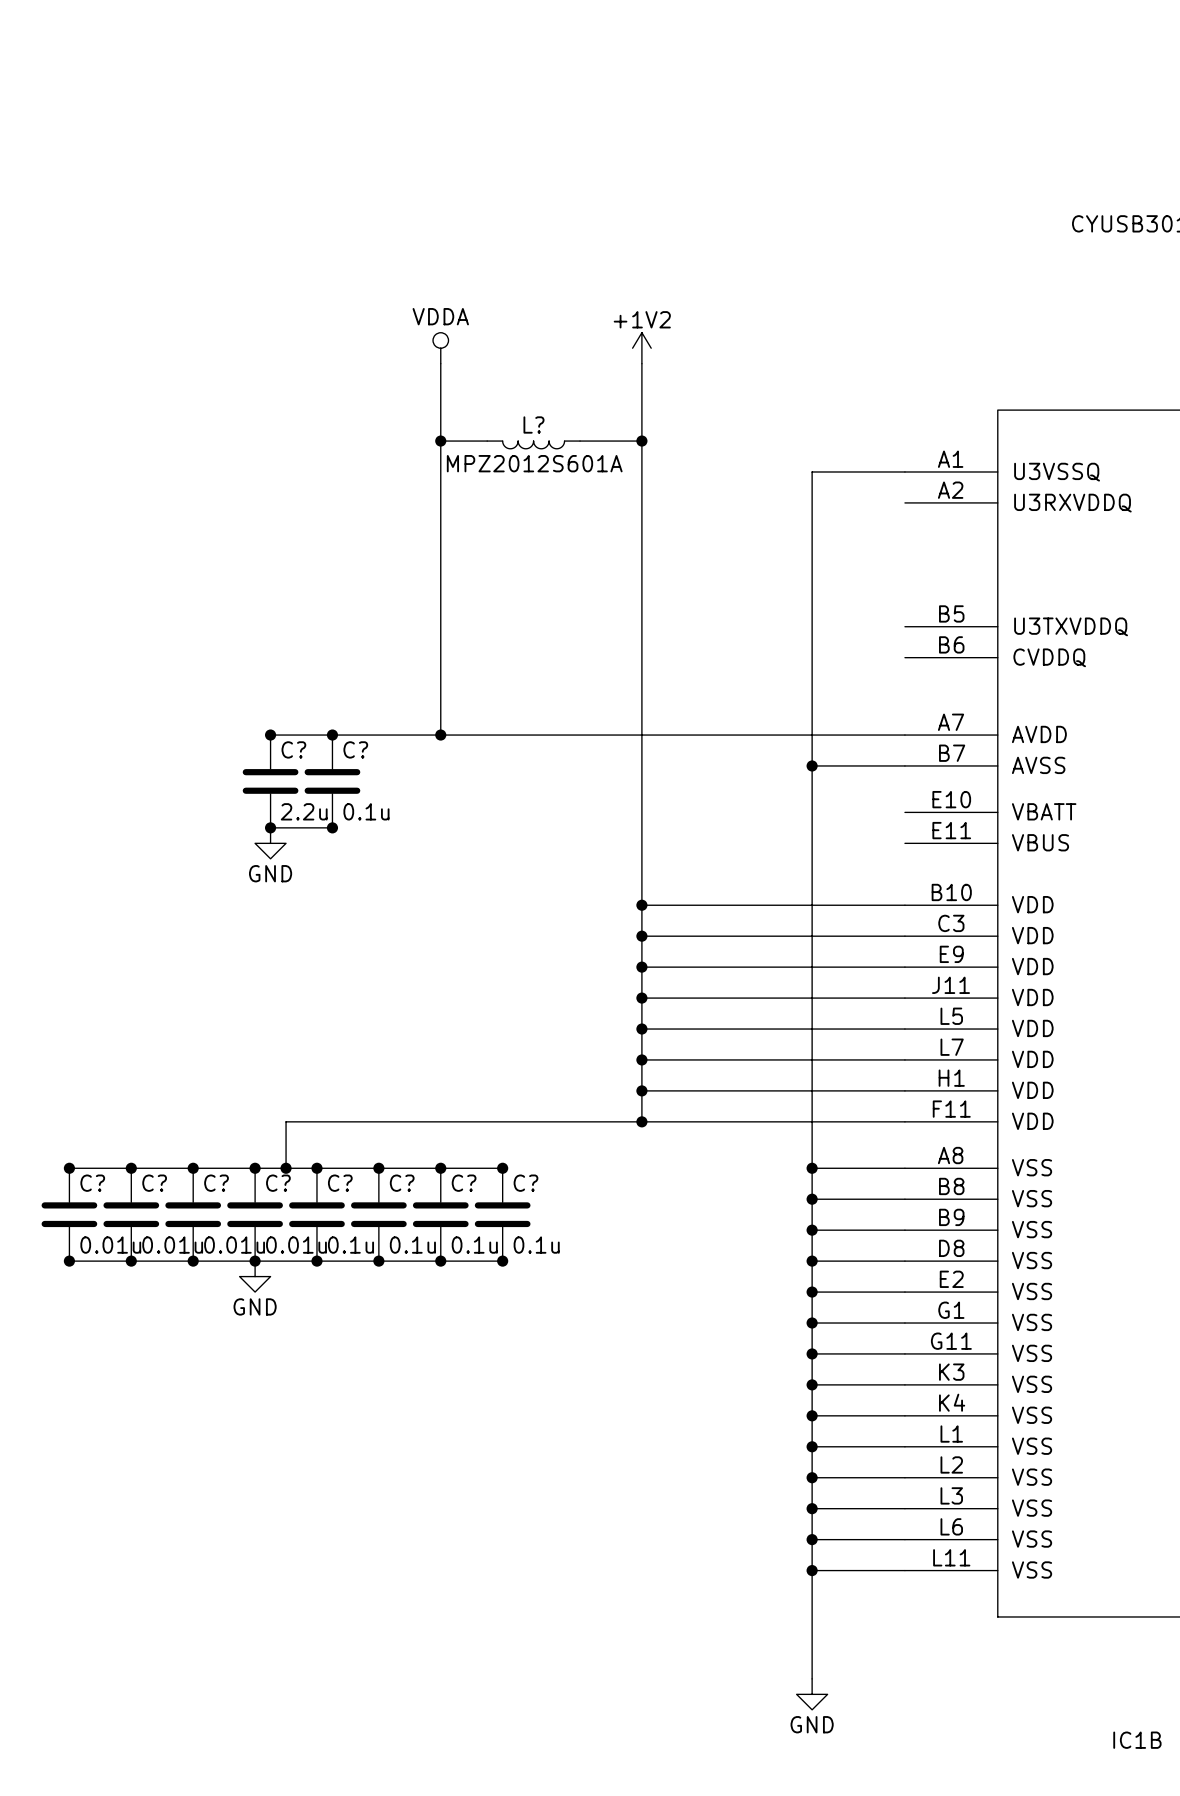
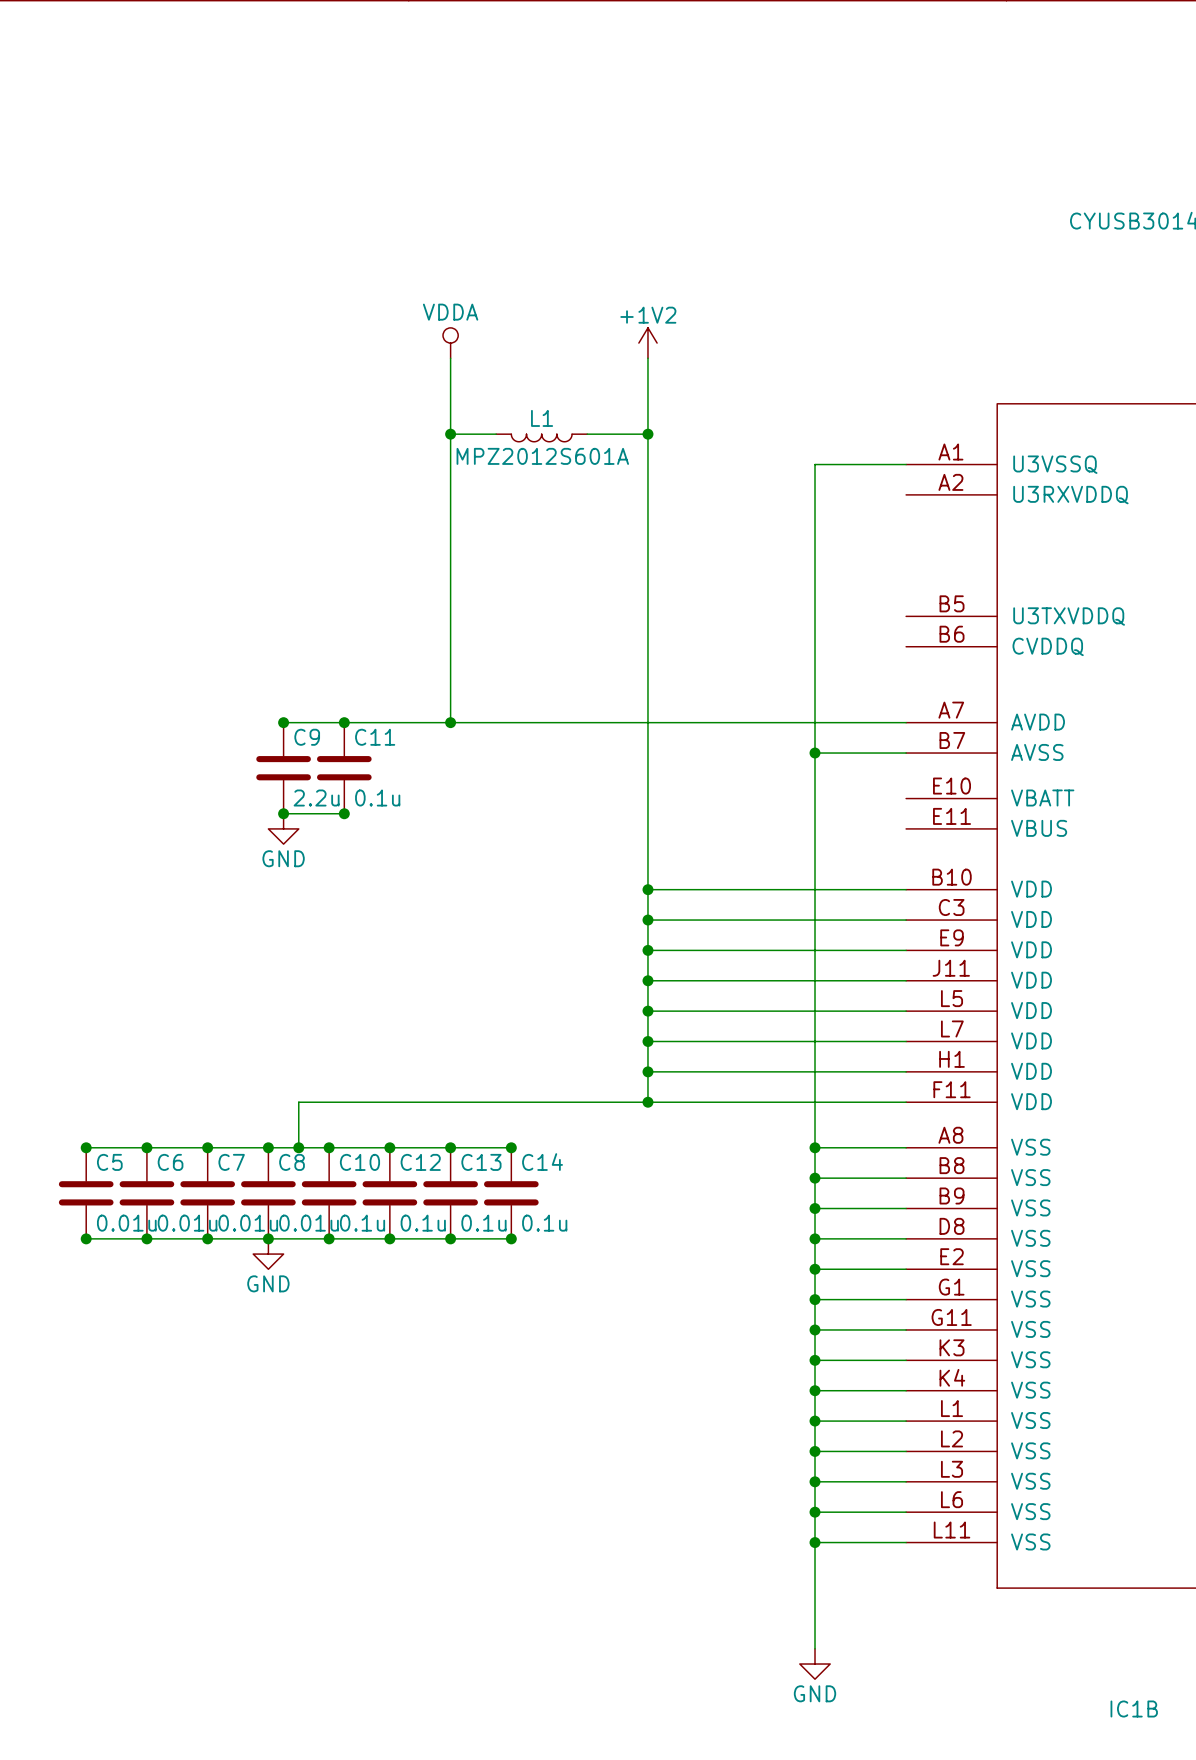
L? name: L? (533, 424) -> L1 (542, 418)
C? name: C? (293, 749) -> C9 (307, 737)
C? name: C? (355, 749) -> C11 (375, 737)
C? name: C? (92, 1183) -> C5 (109, 1162)
C? name: C? (154, 1183) -> C6 (170, 1162)
C? name: C? (216, 1183) -> C7 (231, 1162)
C? name: C? (278, 1183) -> C8 (292, 1162)
C? name: C? (340, 1183) -> C10 (359, 1162)
C? name: C? (402, 1183) -> C12 (420, 1162)
C? name: C? (464, 1183) -> C13 (481, 1162)
C? name: C? (525, 1183) -> C14 (542, 1162)

